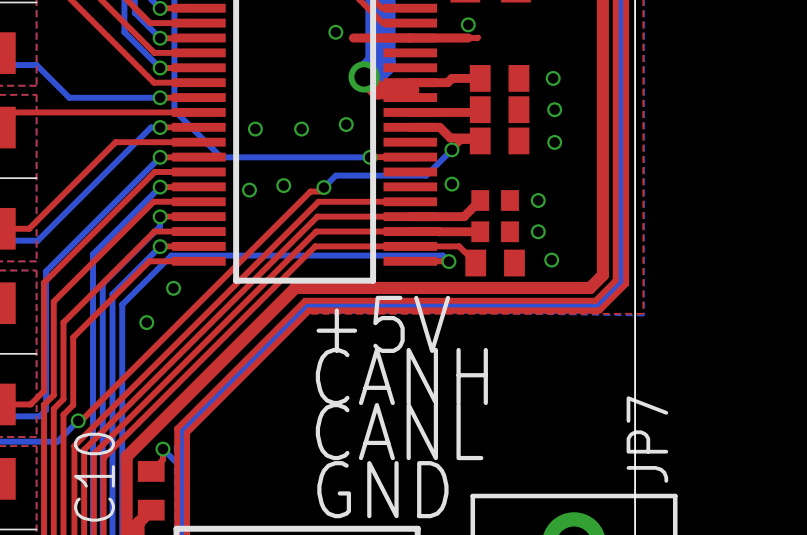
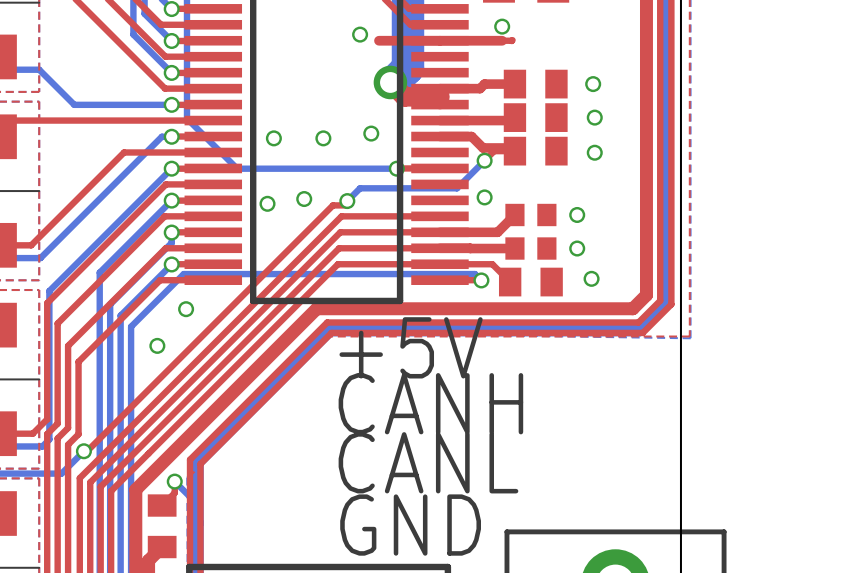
JP7 name: JP7 (647, 439) -> none
C10 name: C10 (94, 477) -> none

